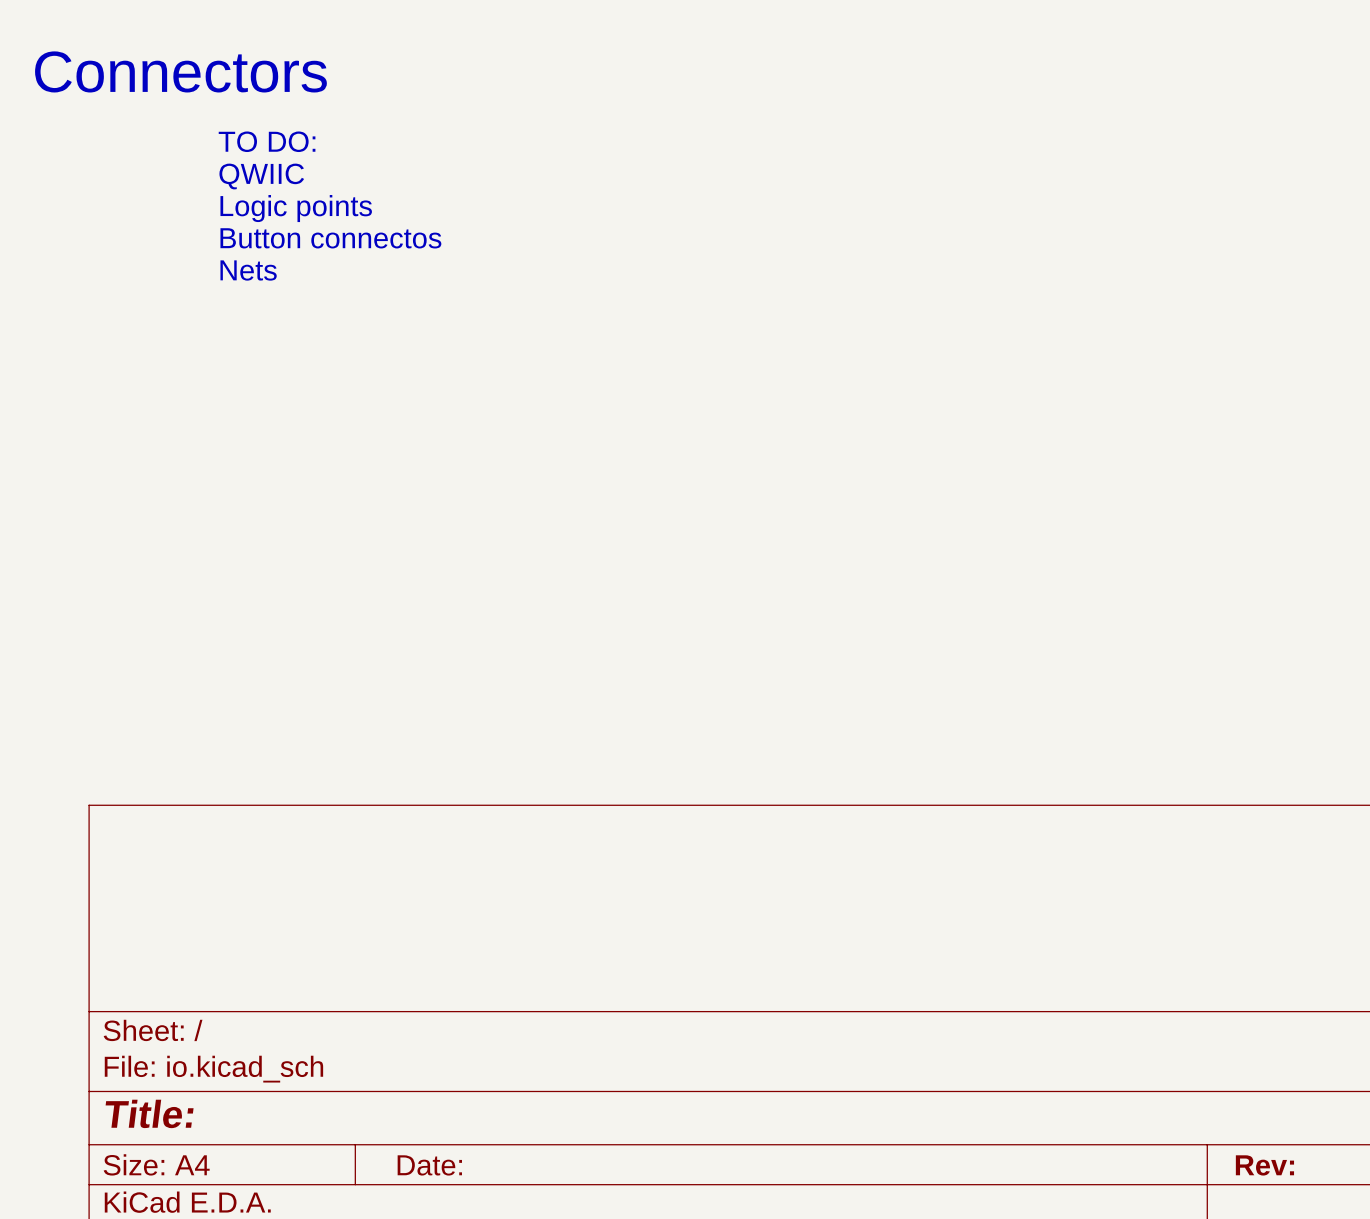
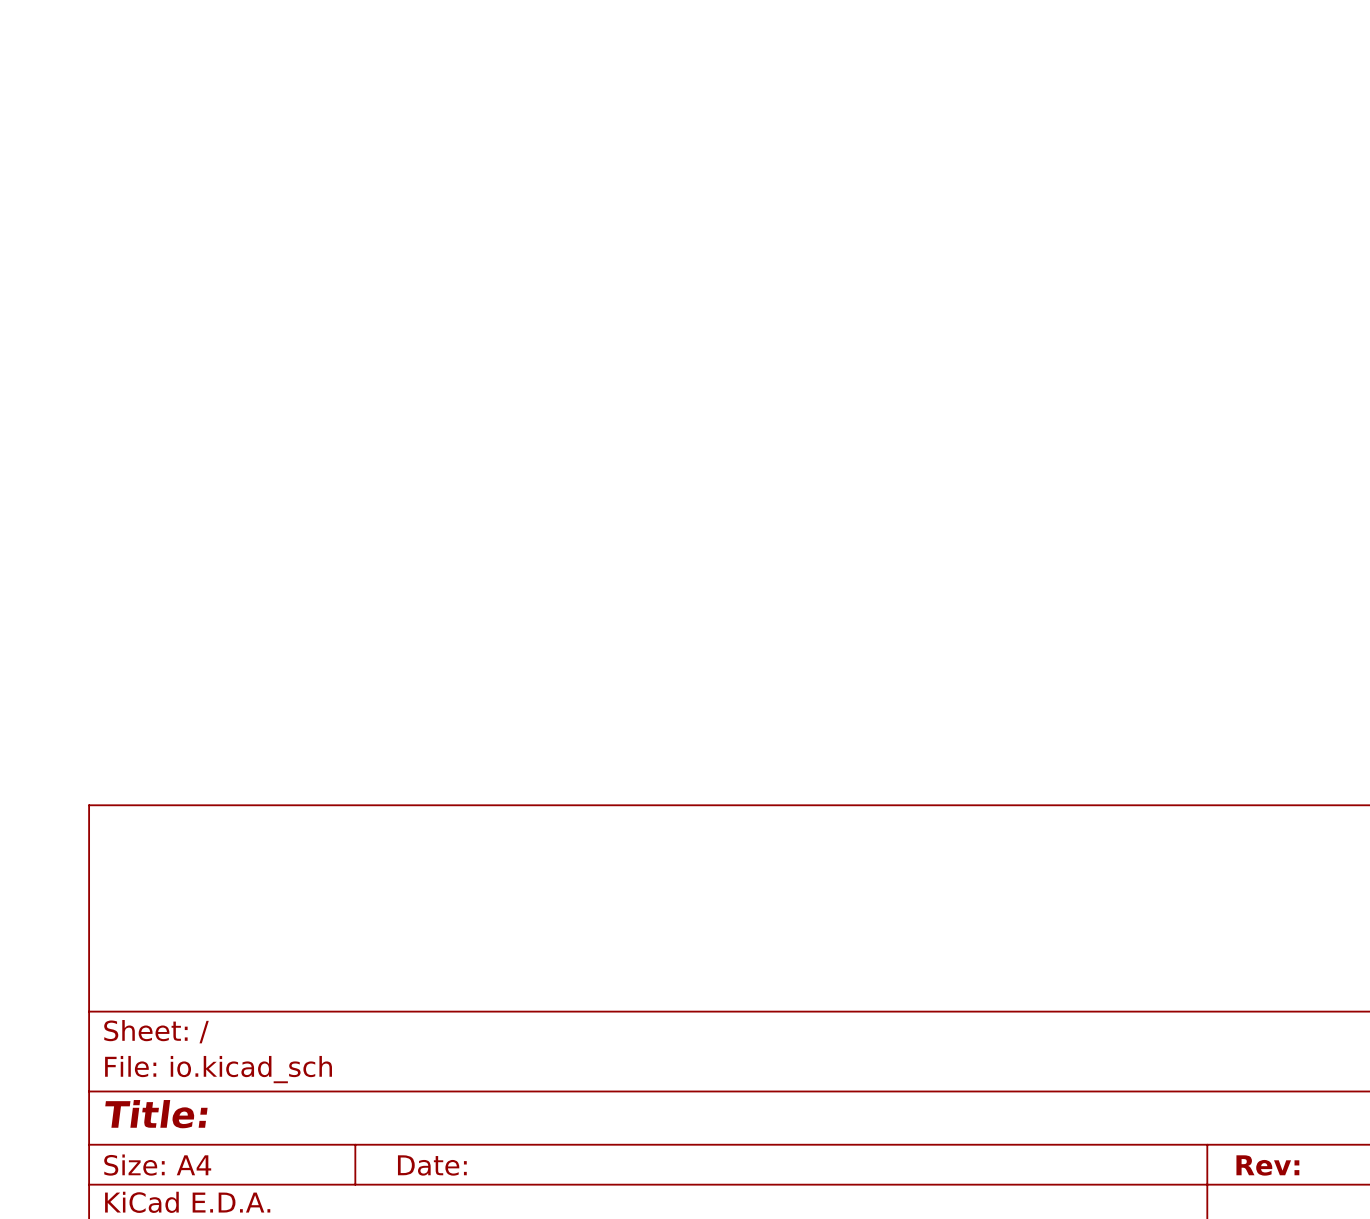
text: Connectors (180, 71) -> none
text: TO DO: (267, 141) -> none
text: QWIIC (261, 176) -> none
text: Logic points (296, 208) -> none
text: Button connectos (330, 238) -> none
text: Nets (248, 270) -> none

